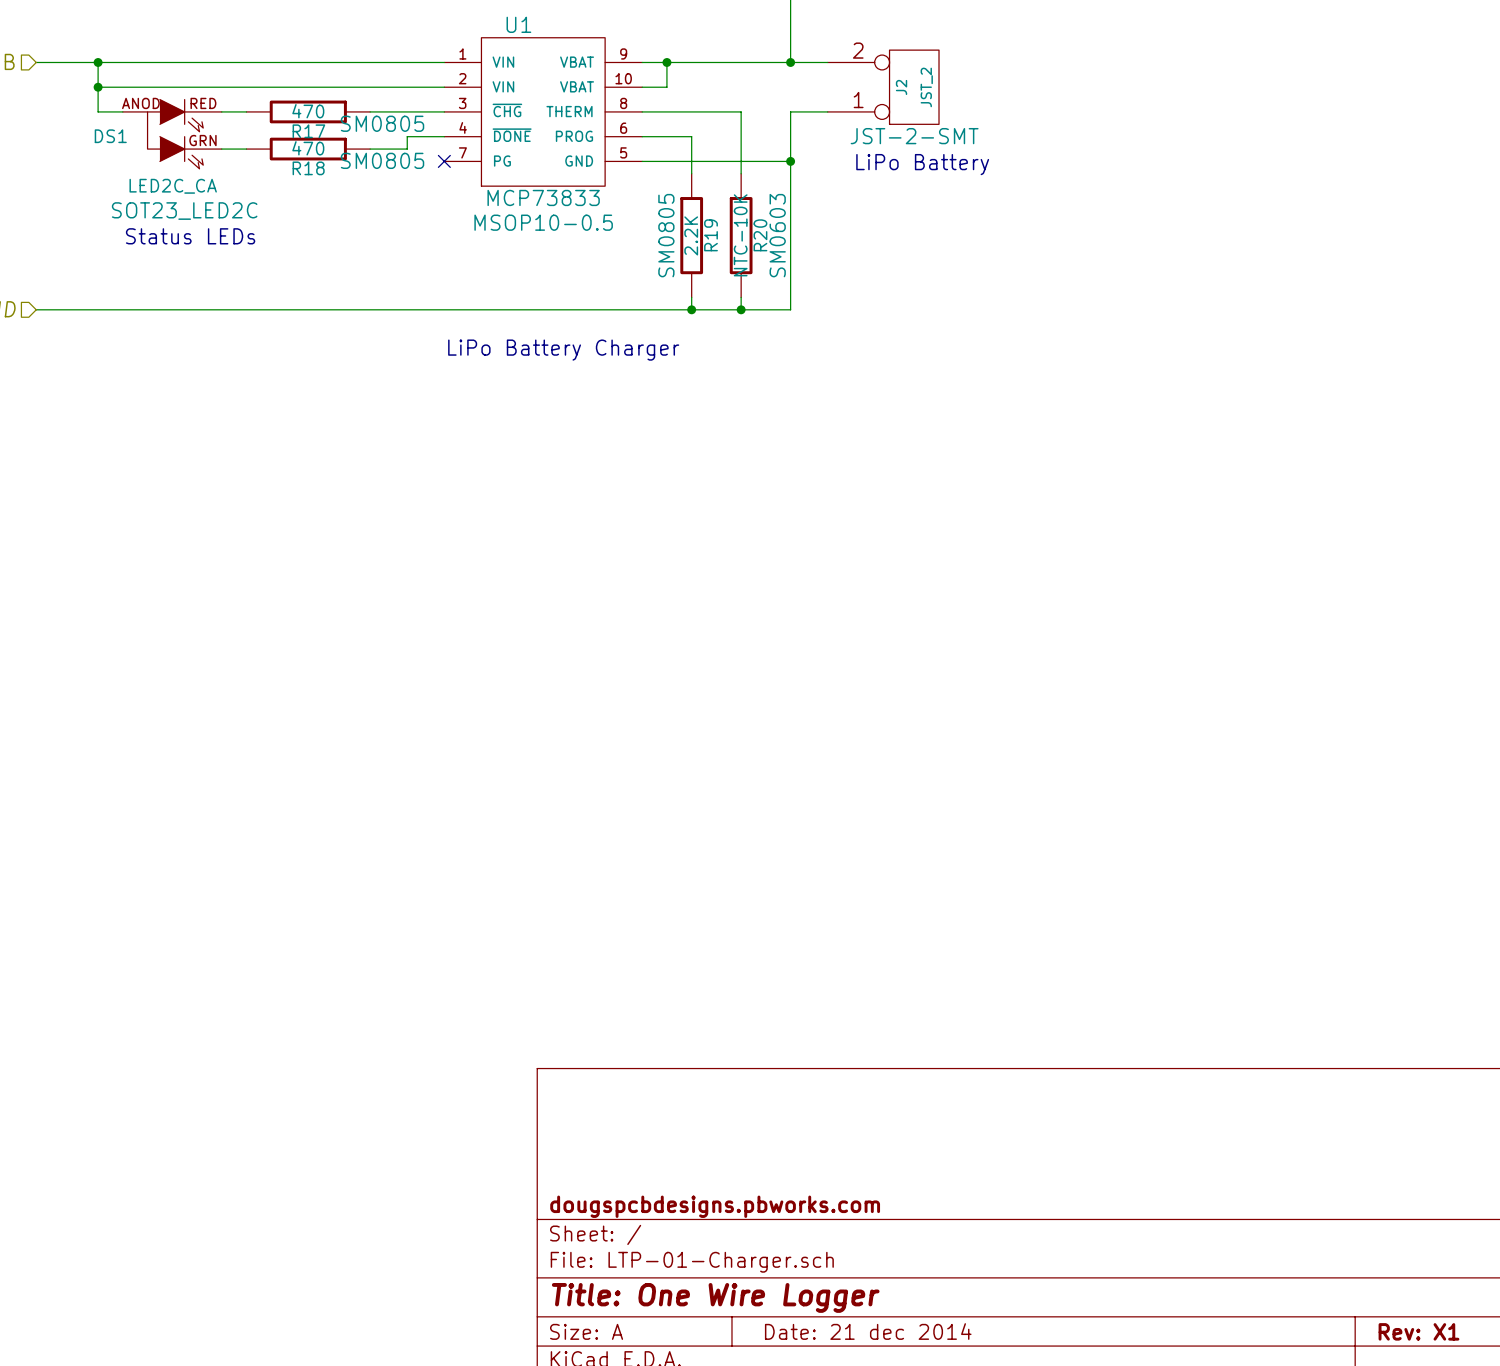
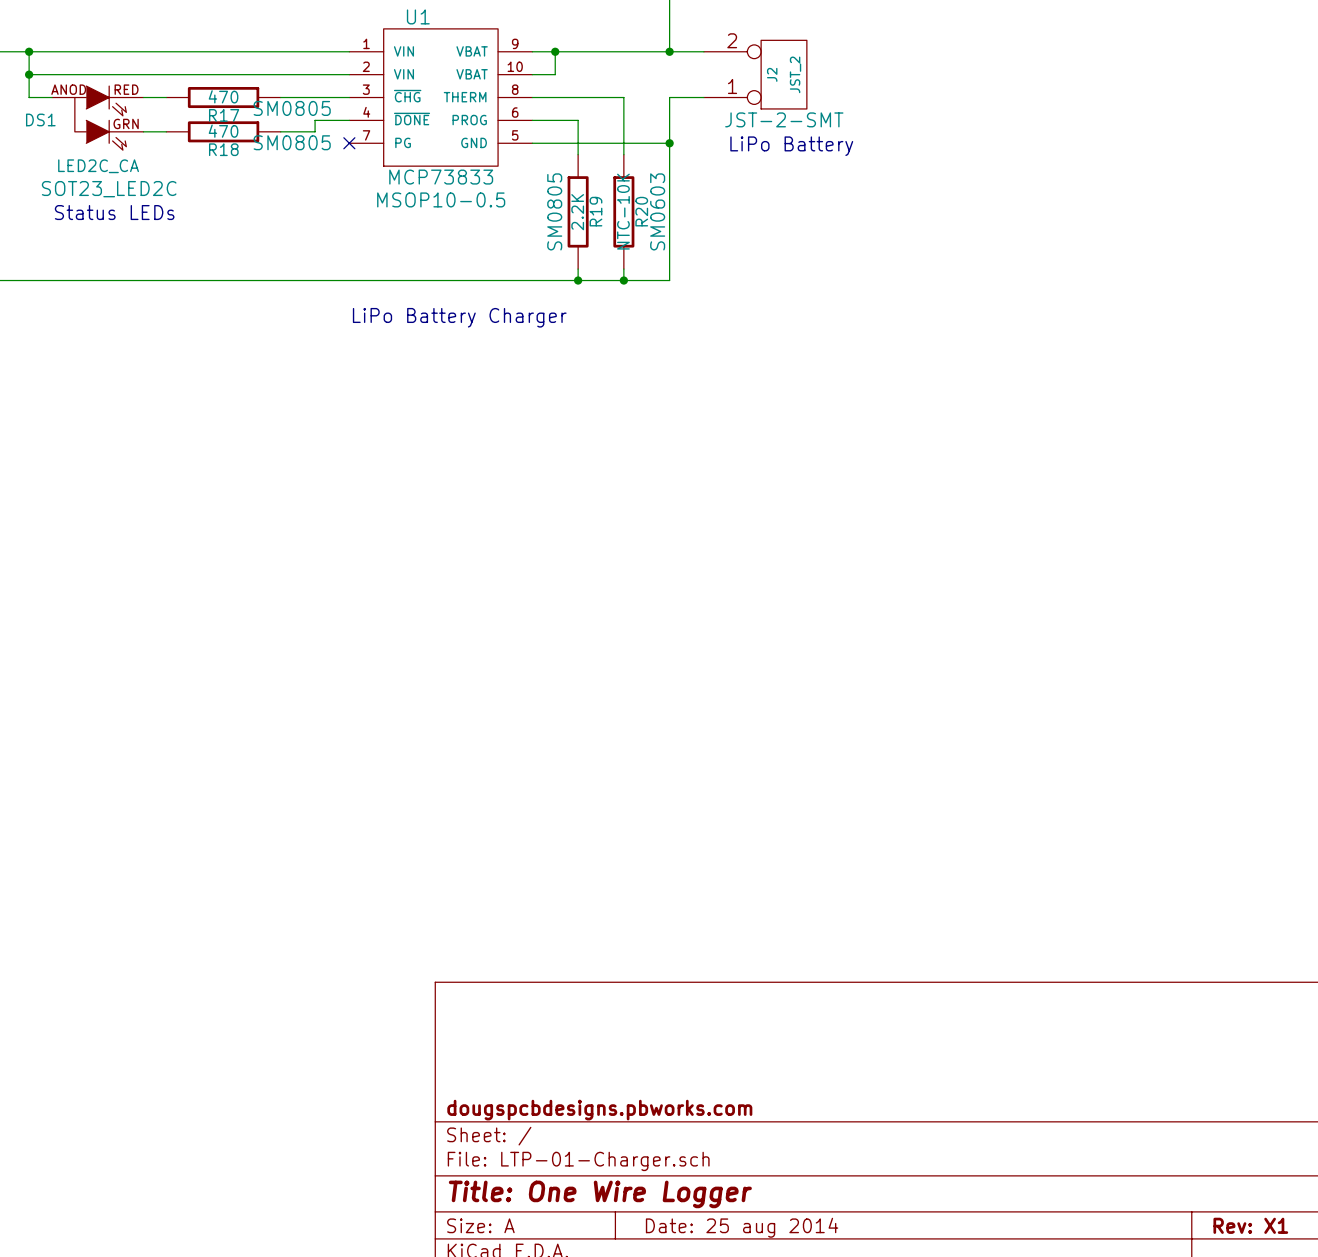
title block: Date: 21 dec 2014 (868, 1331) -> Date: 25 aug 2014 (742, 1227)

